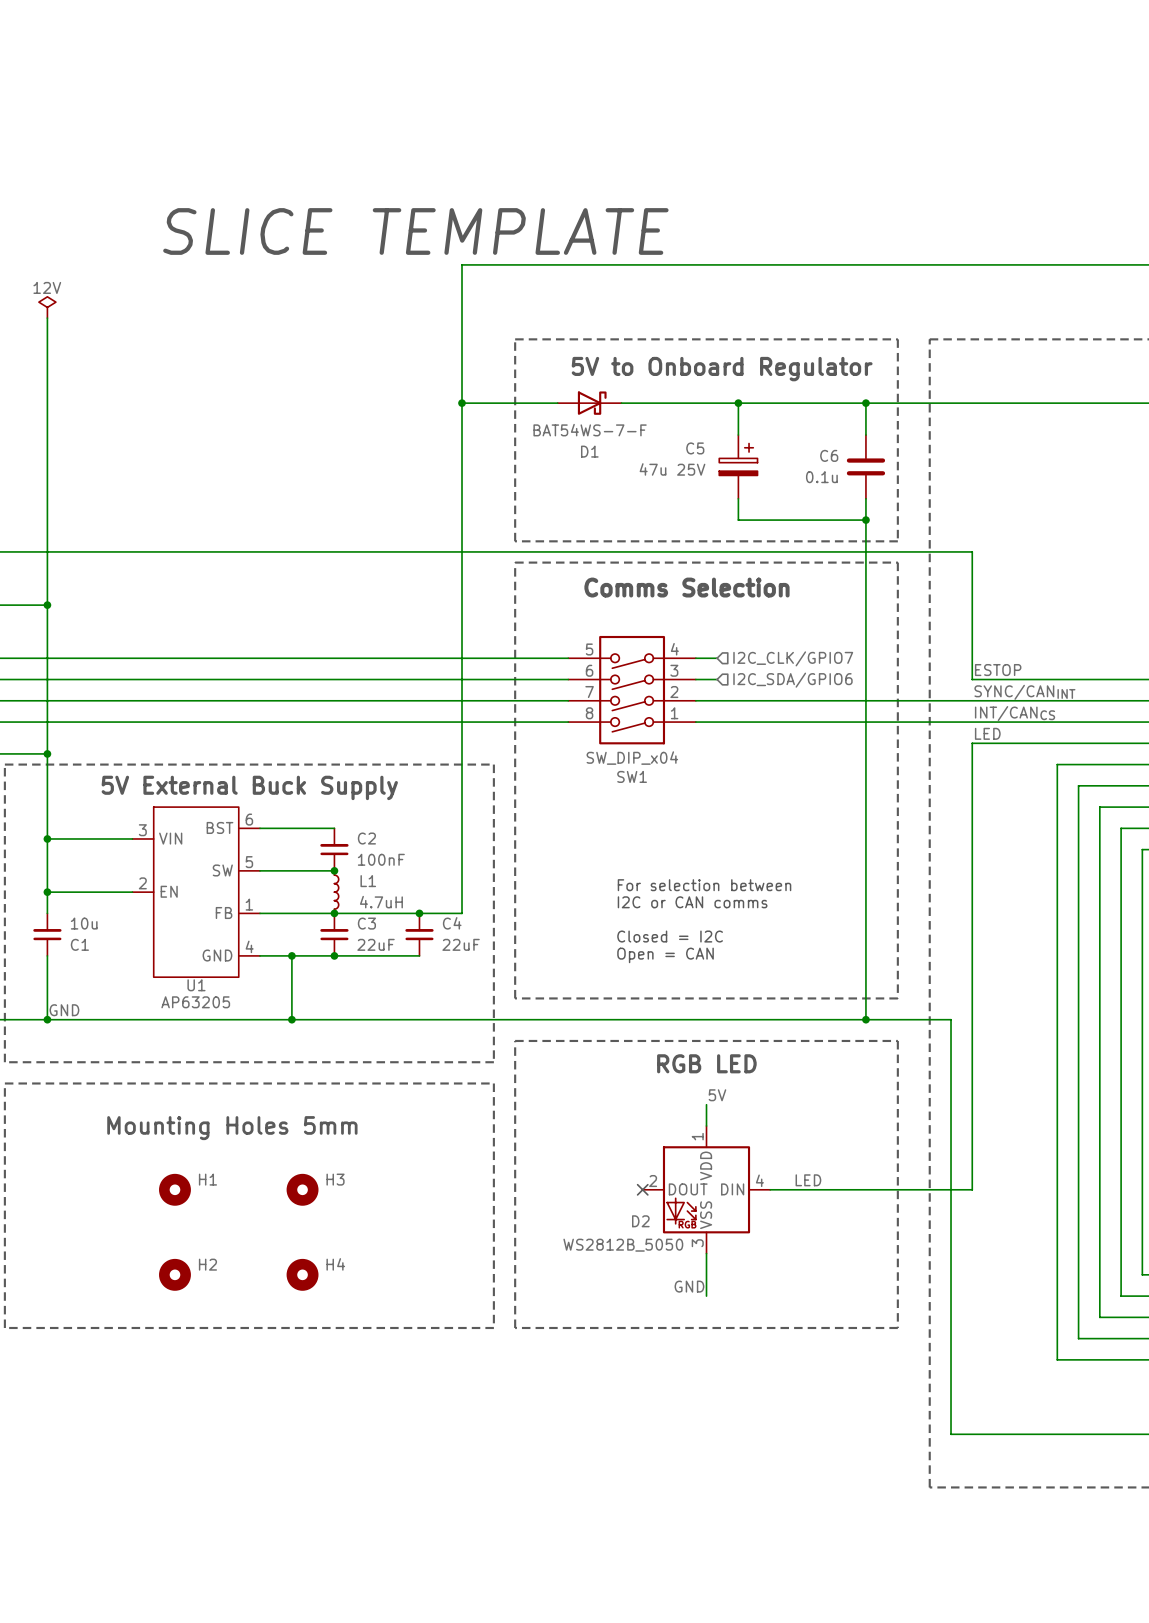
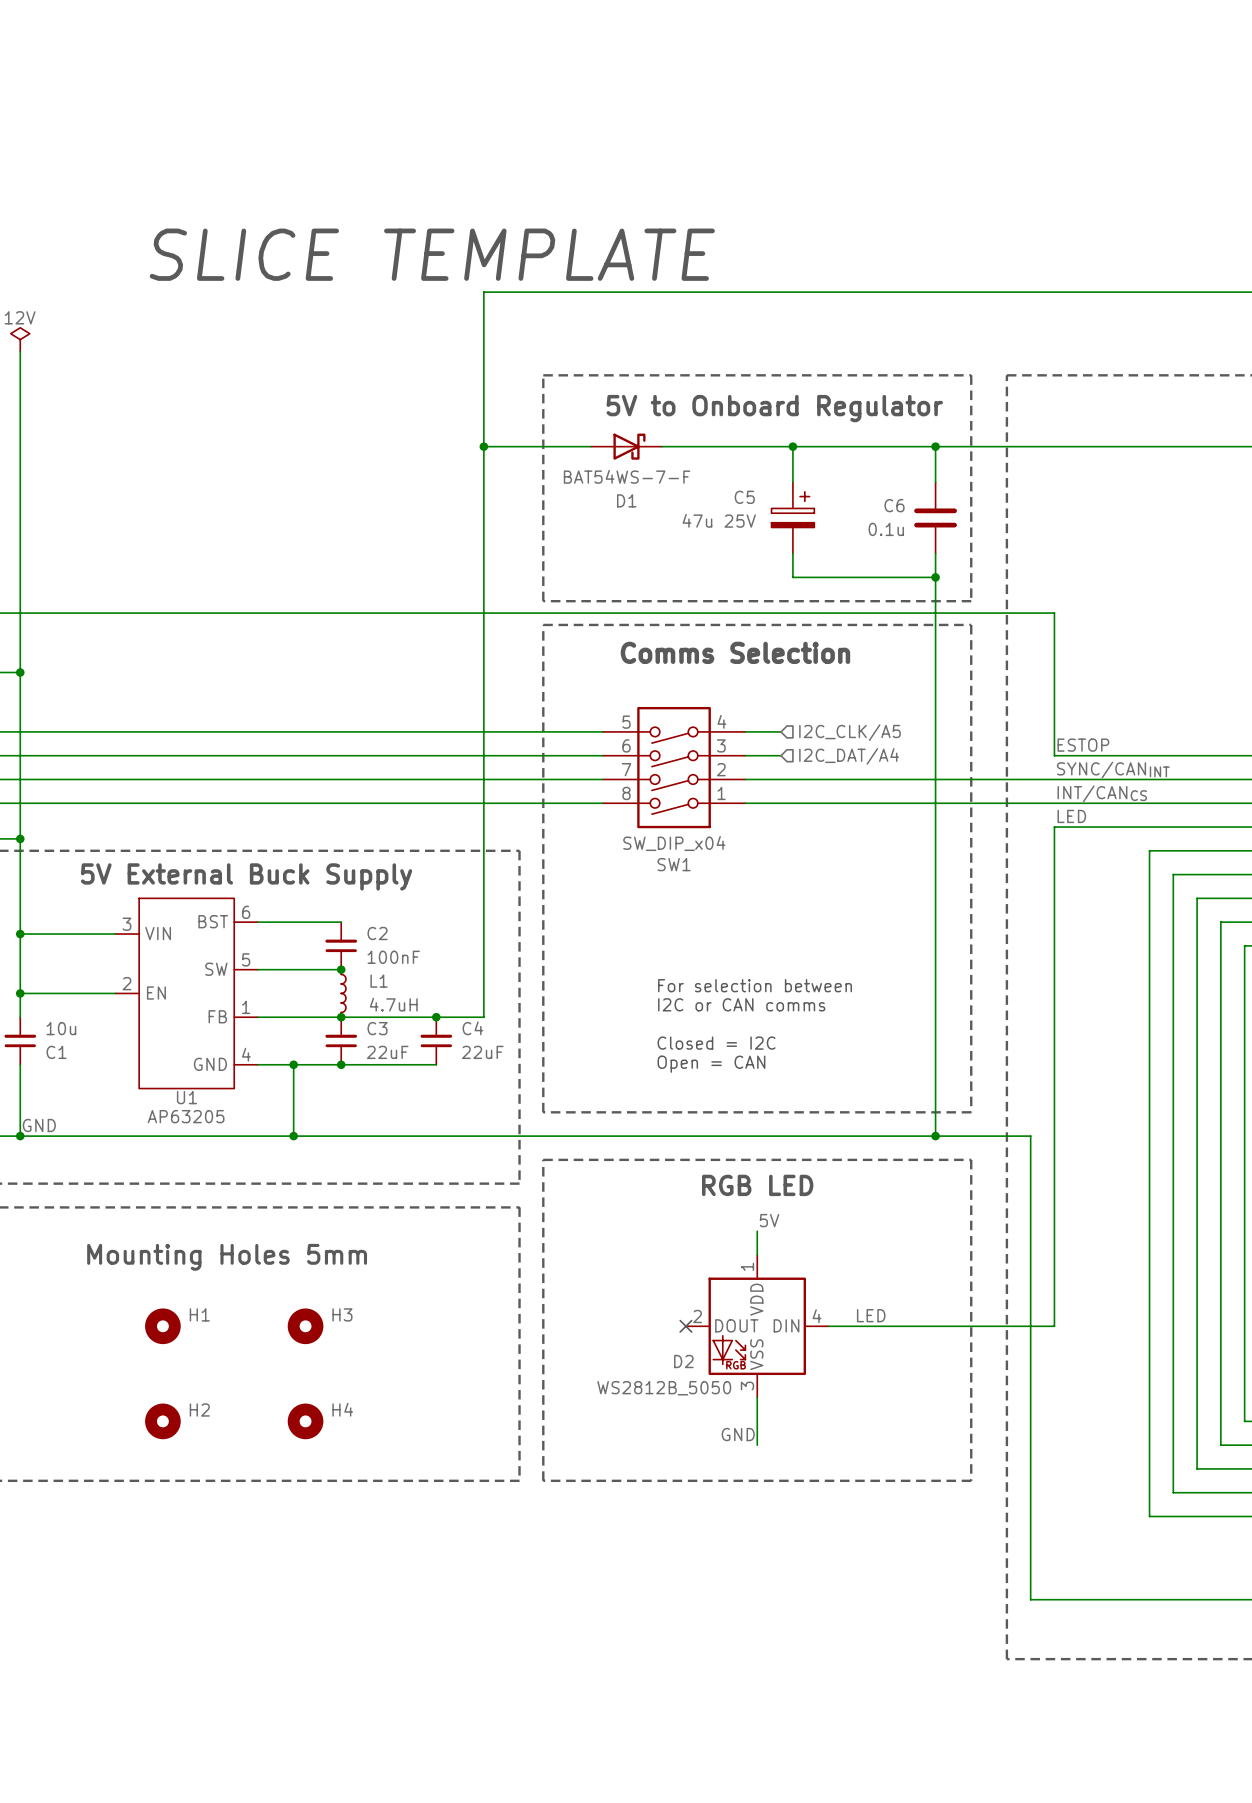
wire: none -> (769, 731) (781, 731)
hierarchical label: I2C_CLK/GPIO7 (793, 658) -> I2C_CLK/A5 (850, 732)
wire: none -> (769, 755) (781, 755)
hierarchical label: I2C_SDA/GPIO6 (792, 680) -> I2C_DAT/A4 (849, 756)

